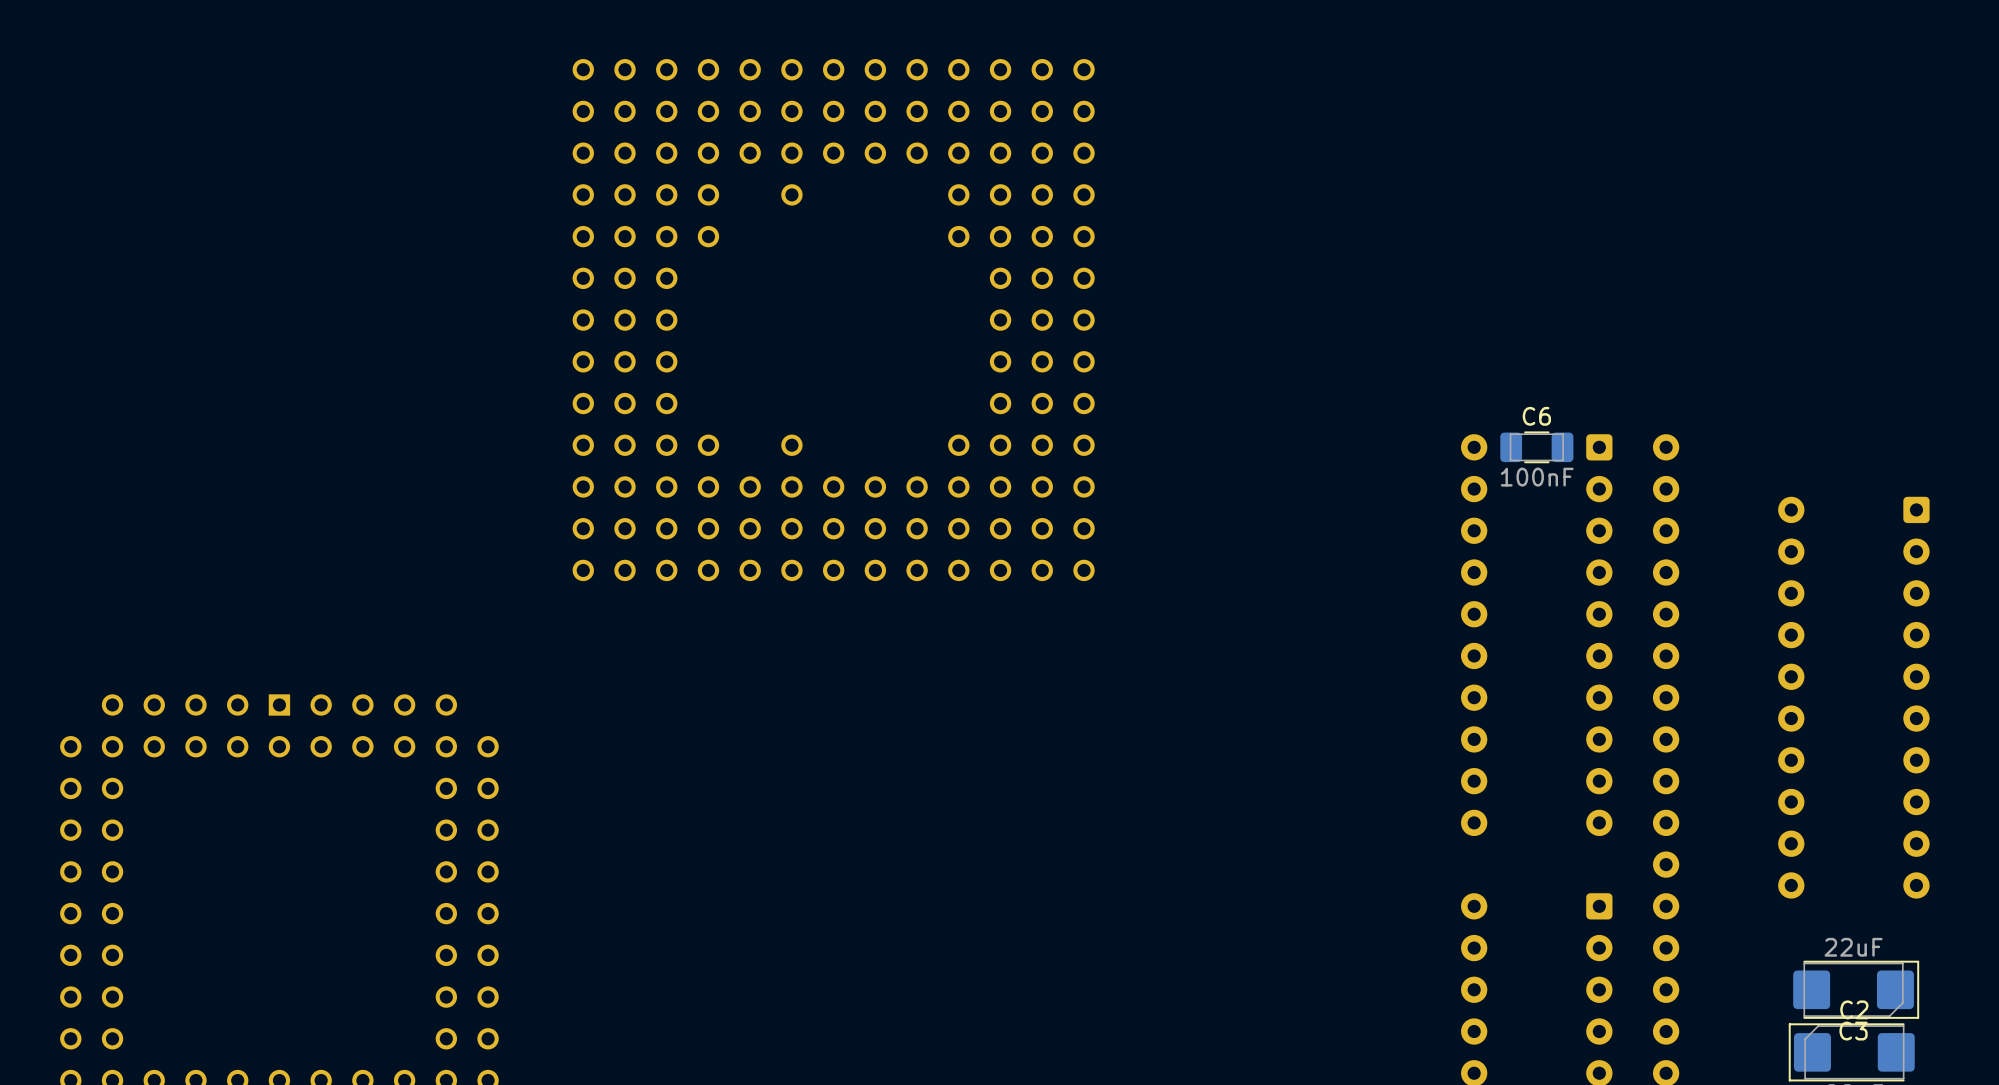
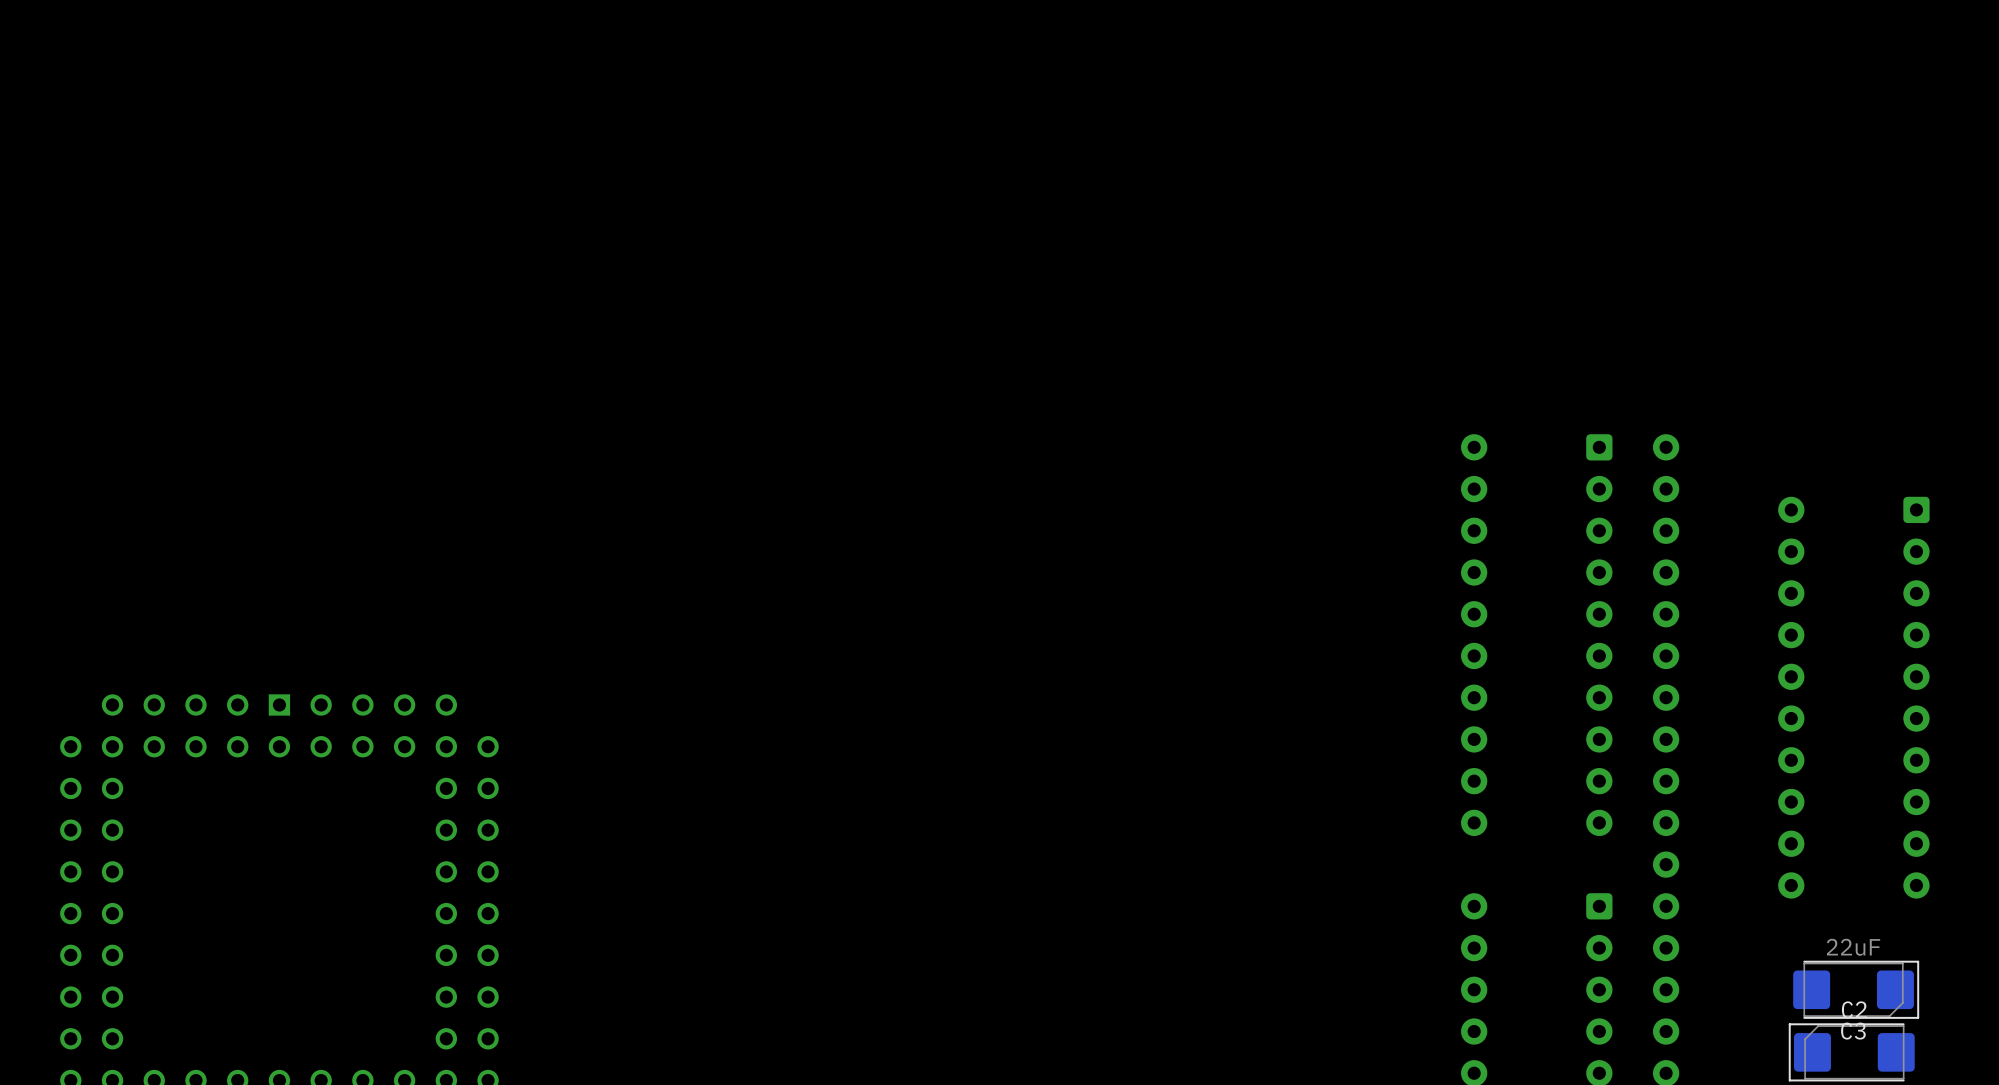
part: (833, 320) -> none
C6: 100nF (1536, 447) -> none

